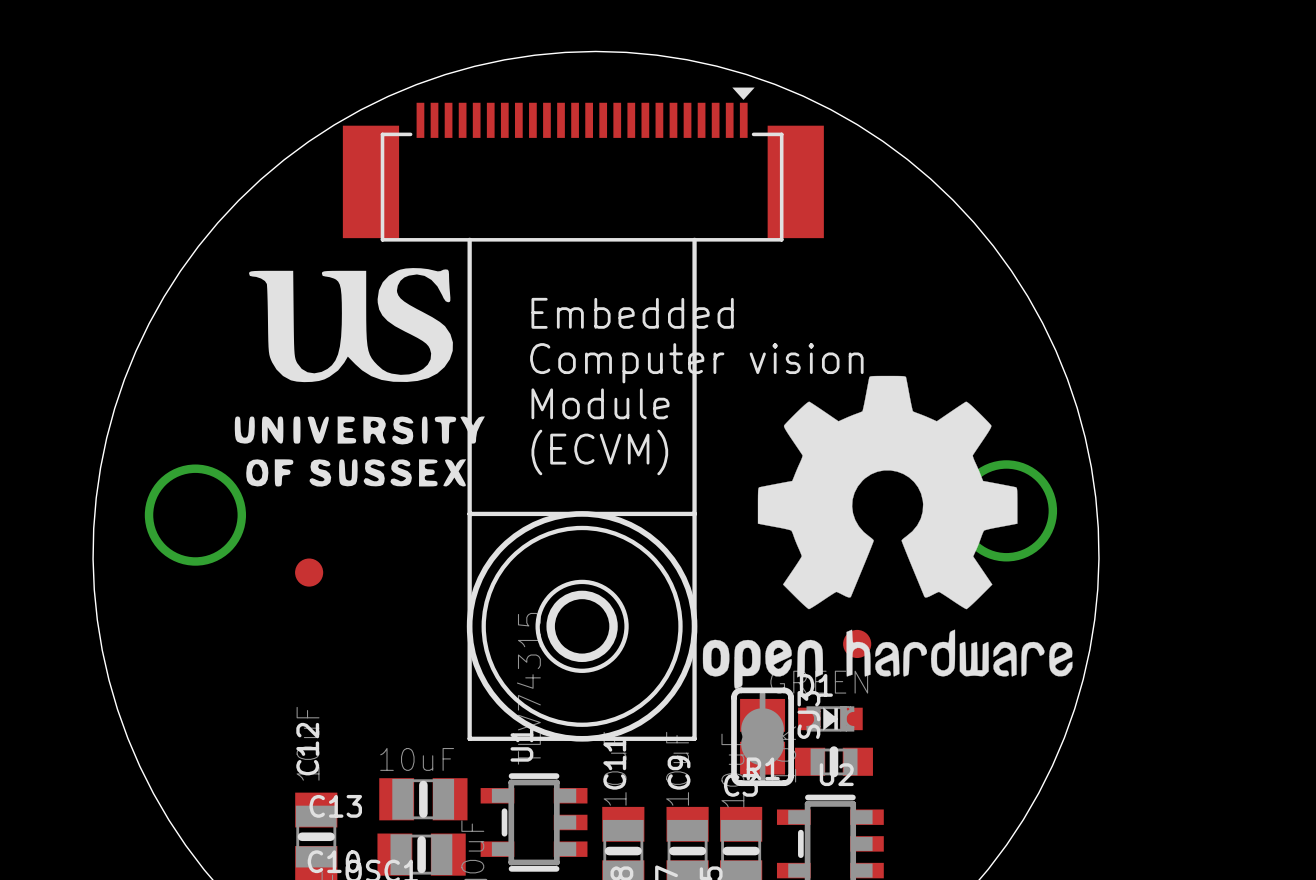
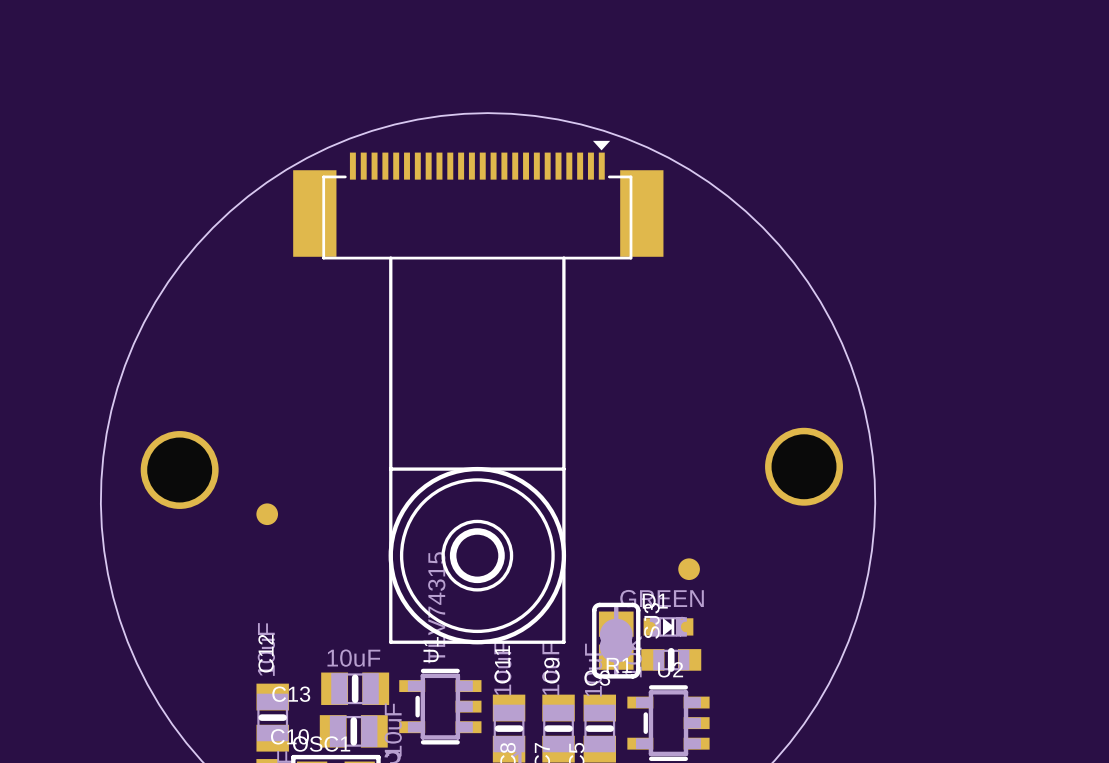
drawing: [234, 268, 485, 487] -> none
text: Embedded (632, 313) -> none
text: Computer vision (696, 363) -> none
drawing: [702, 375, 1073, 689] -> none
text: Module (600, 403) -> none
text: (ECVM) (599, 452) -> none

